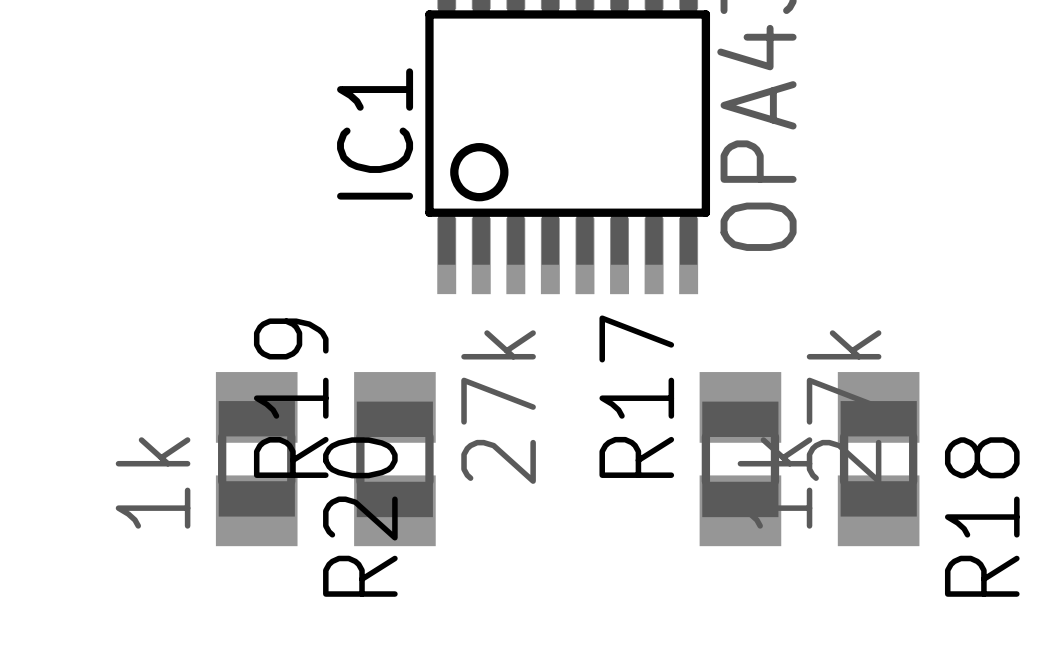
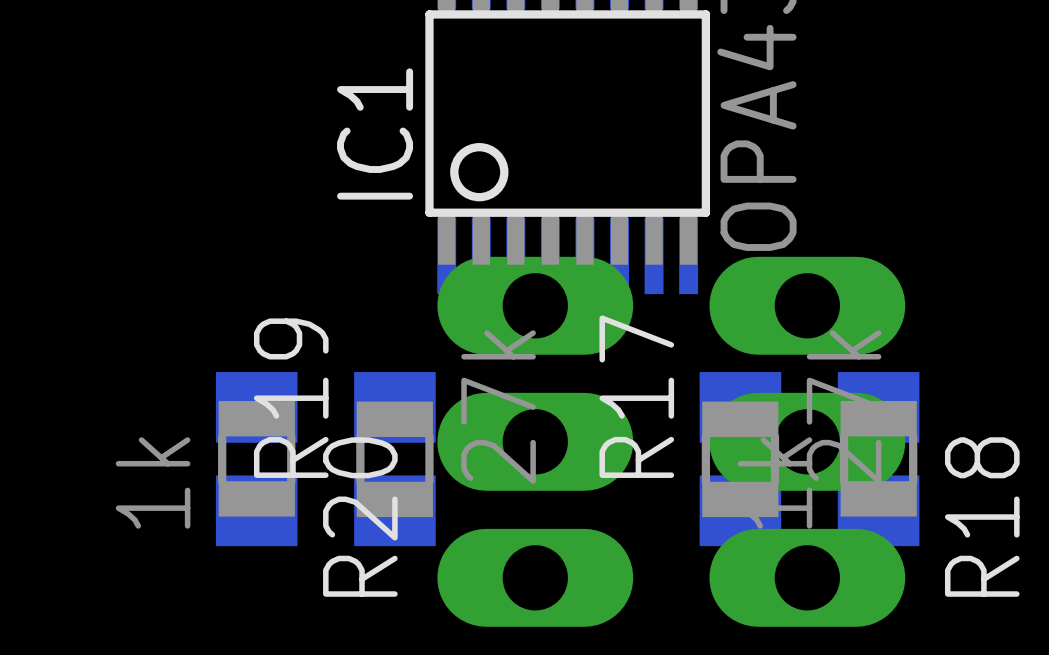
part: none -> (671, 441)

